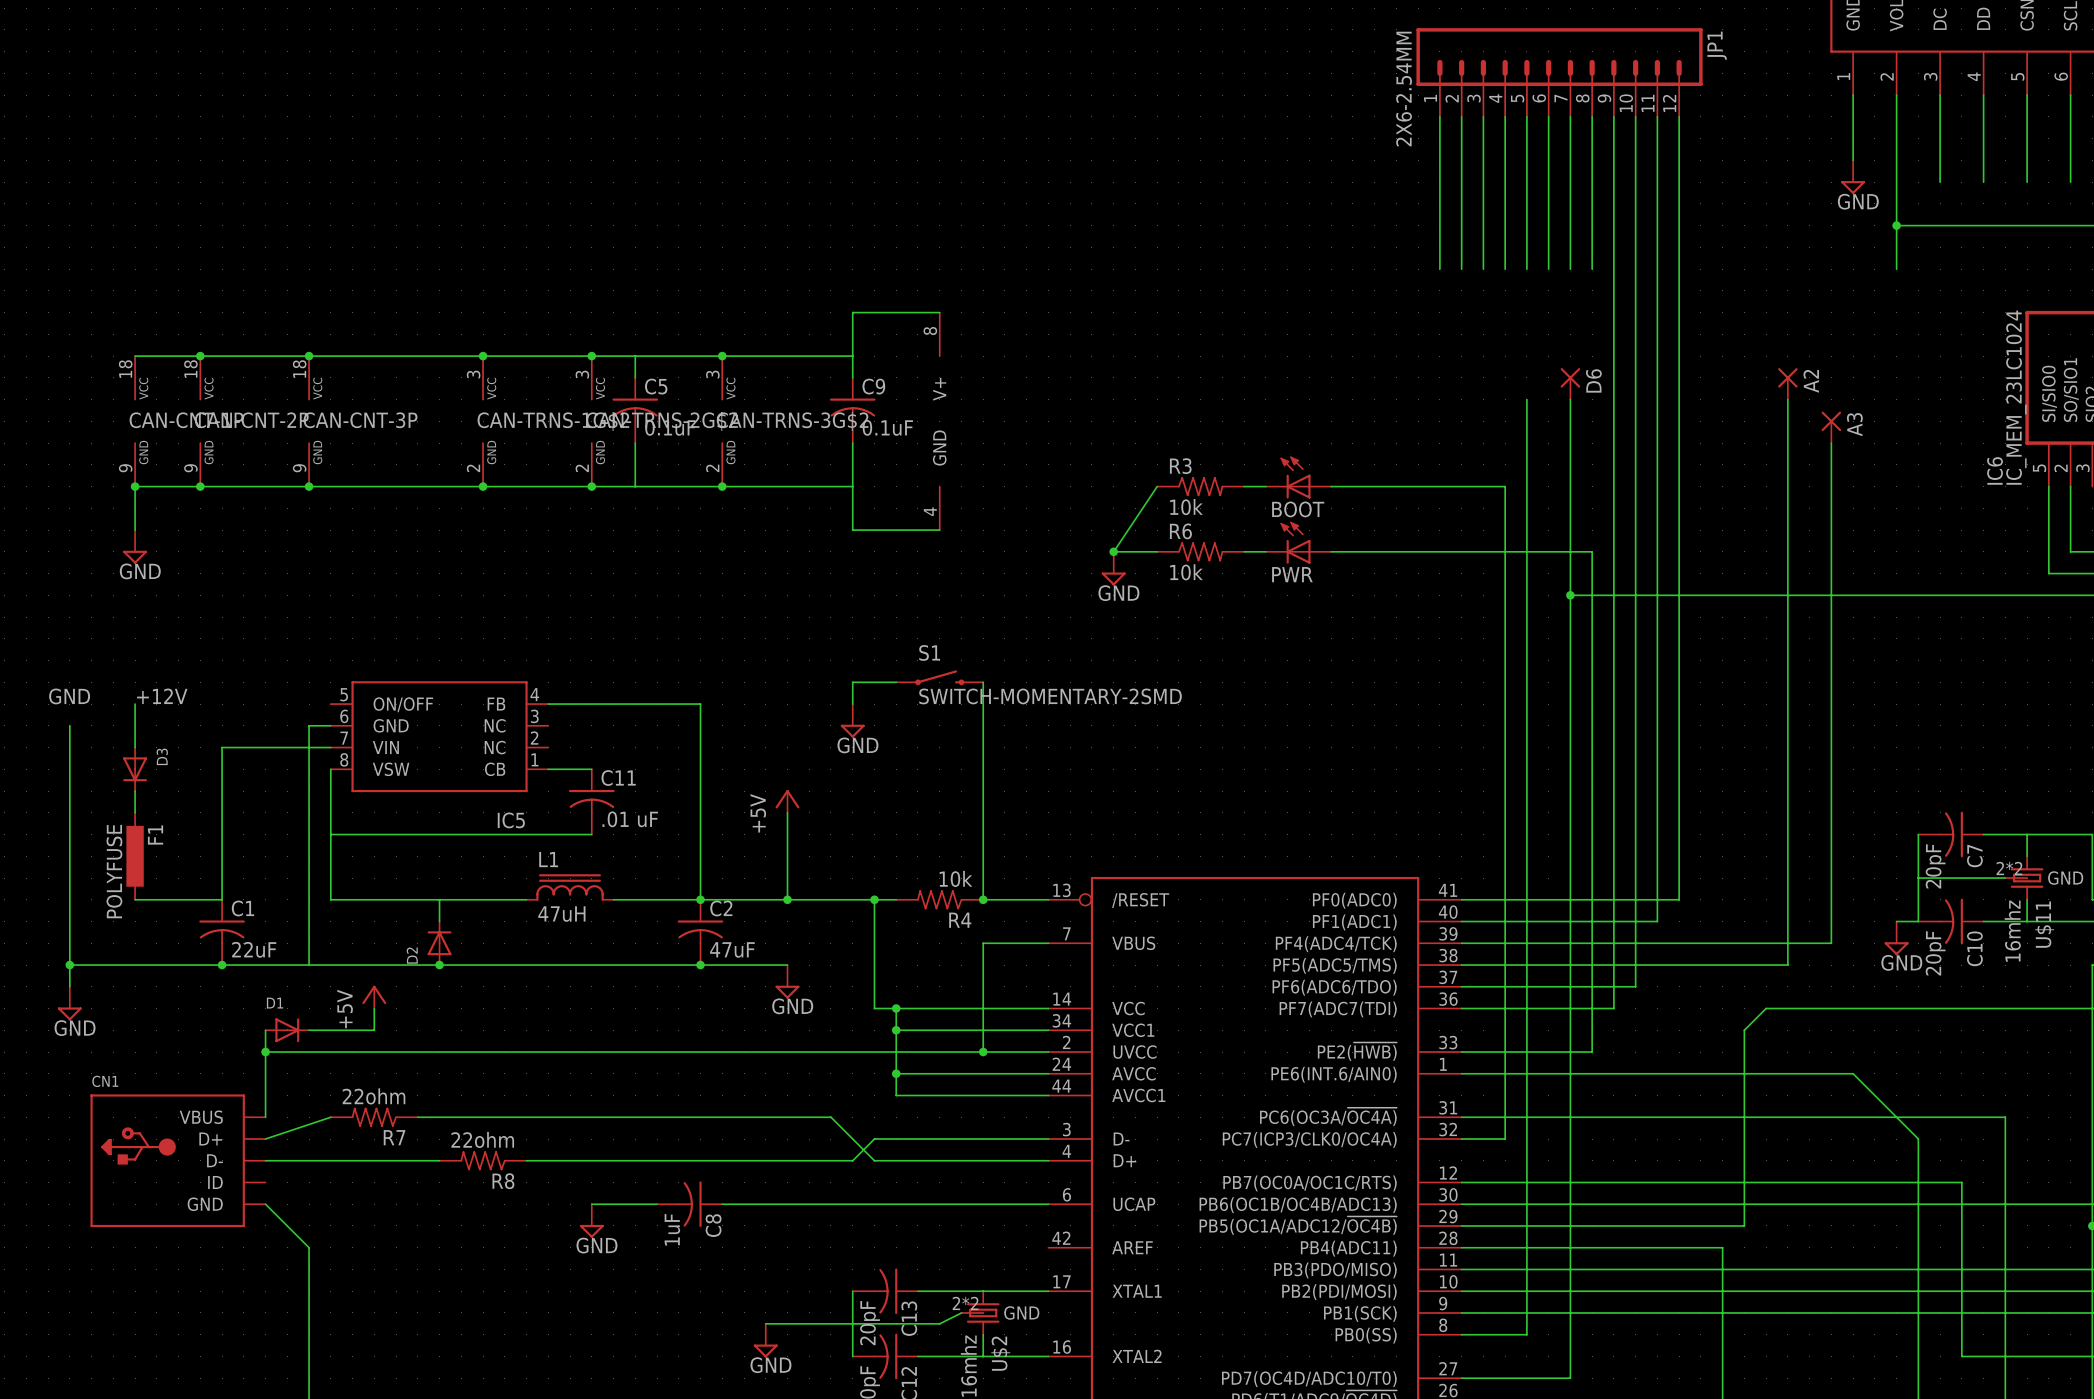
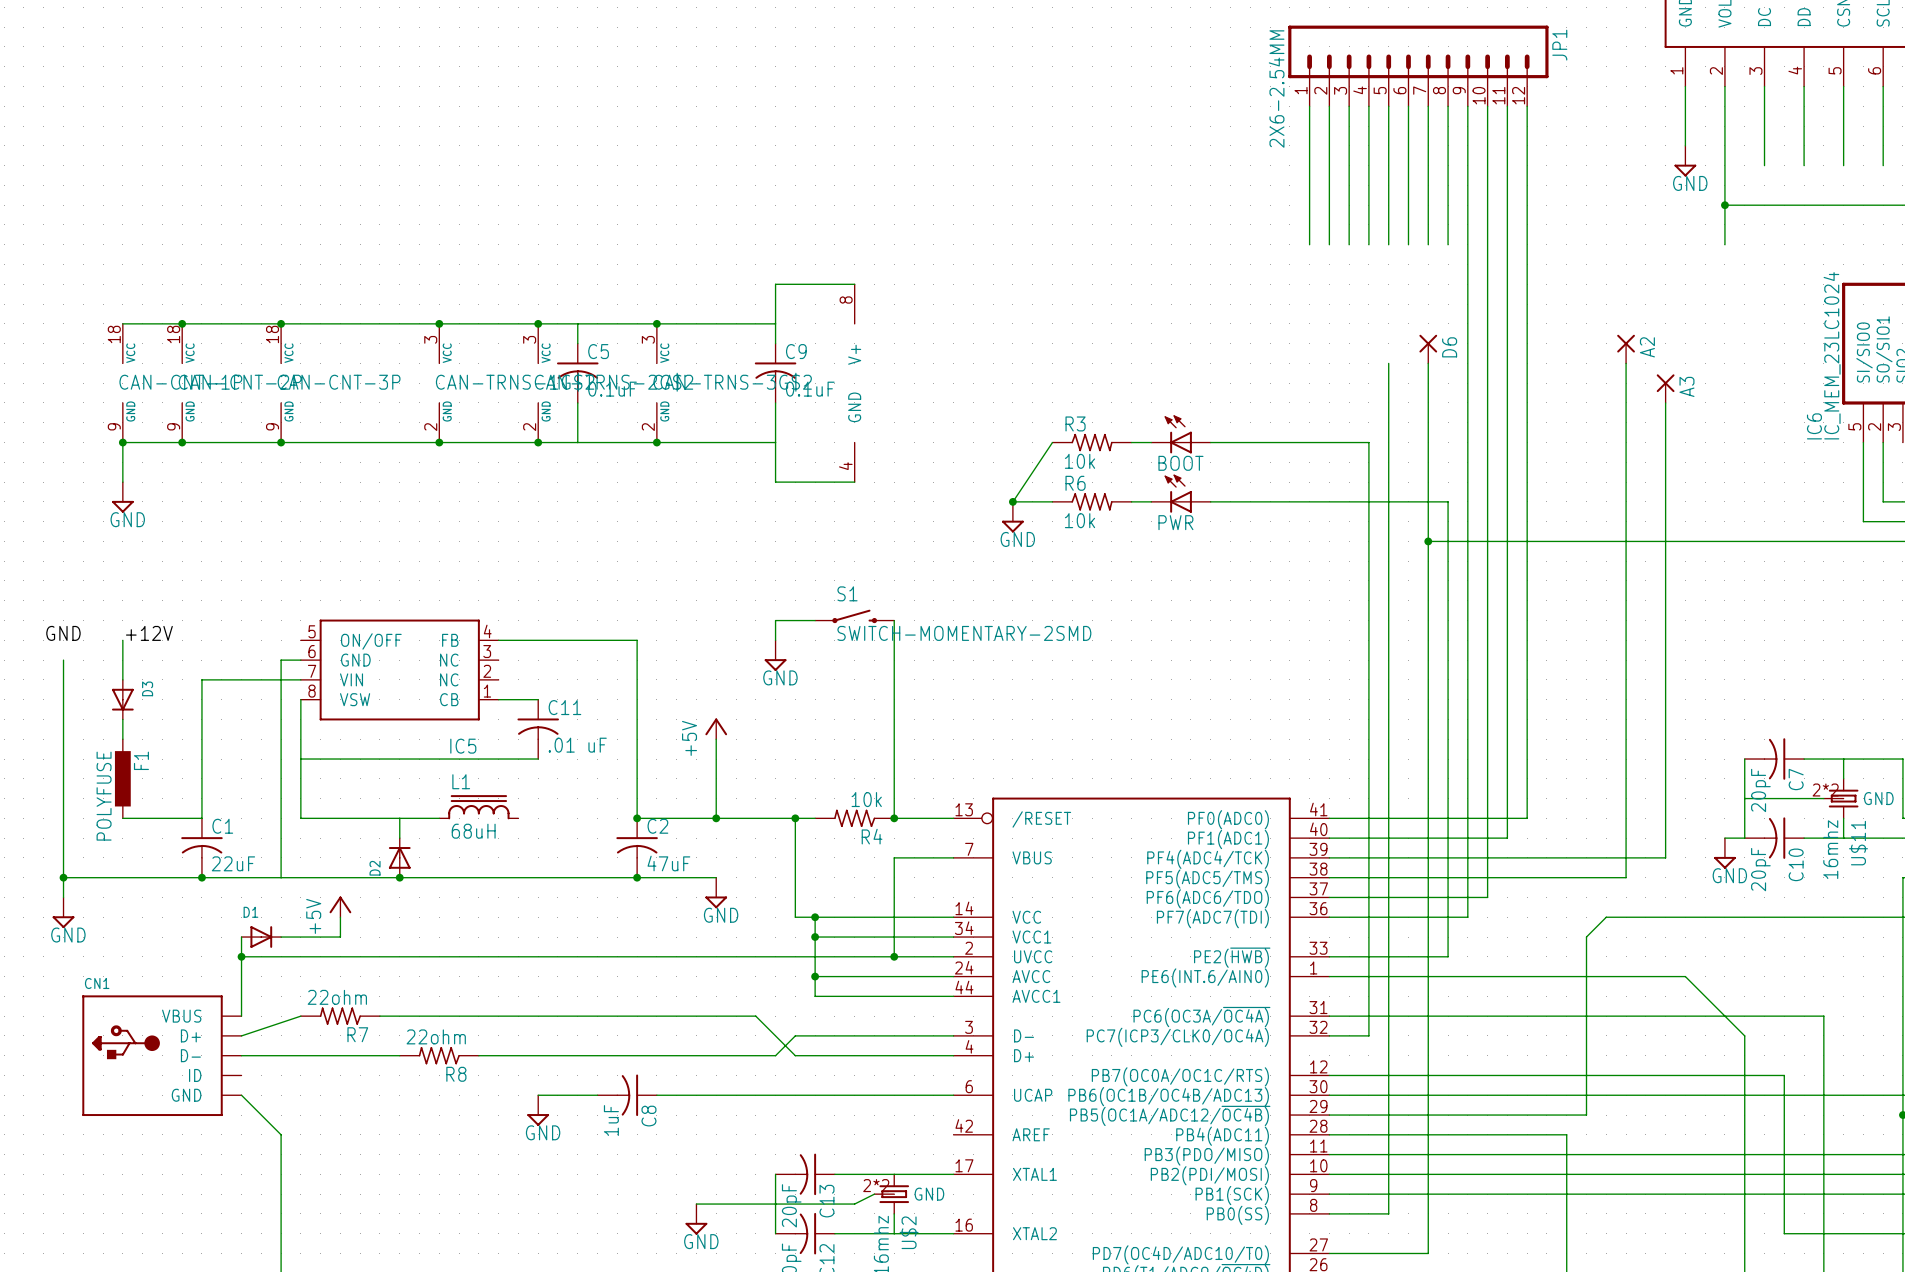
L1 position: (570, 887) -> (478, 807)
wire: (483, 899) (526, 899) -> none
wire: (613, 899) (700, 899) -> none
L1 value: 47uH (561, 914) -> 68uH (473, 831)

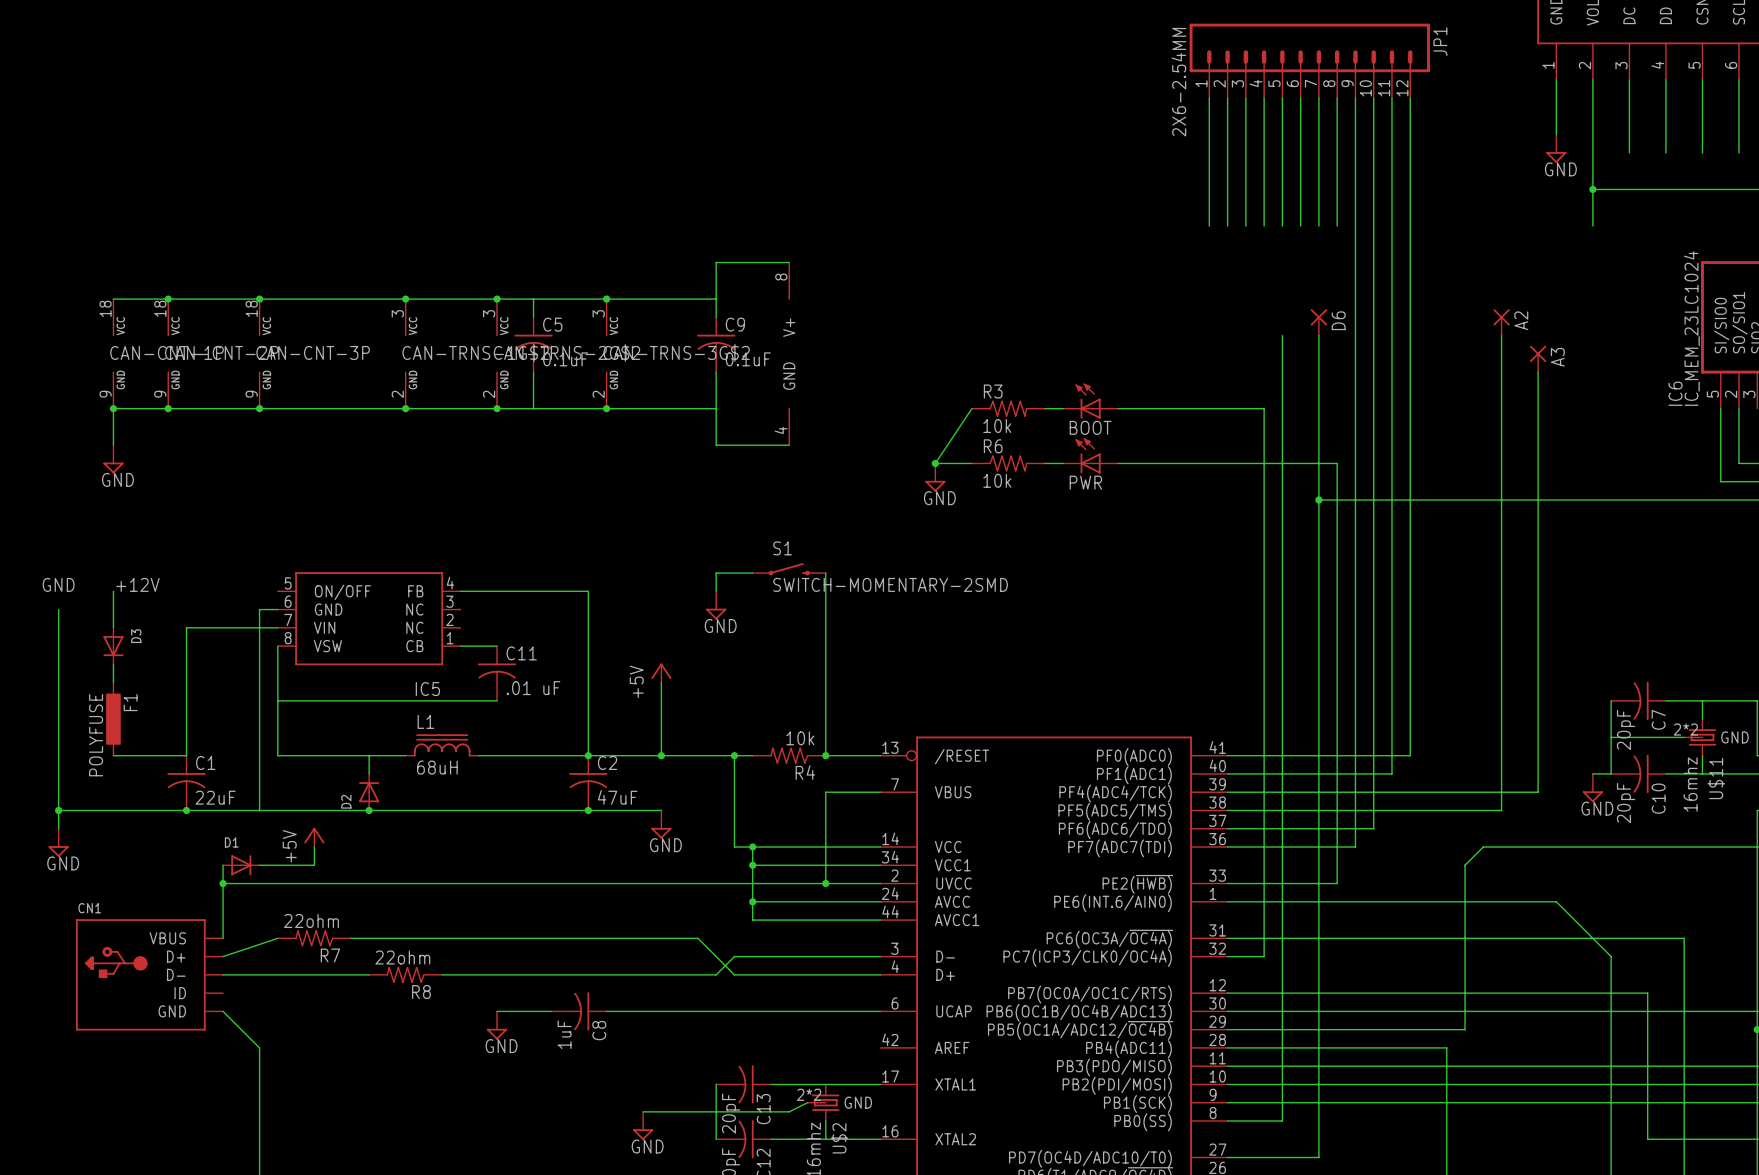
wire: none -> (478, 755) (588, 755)

